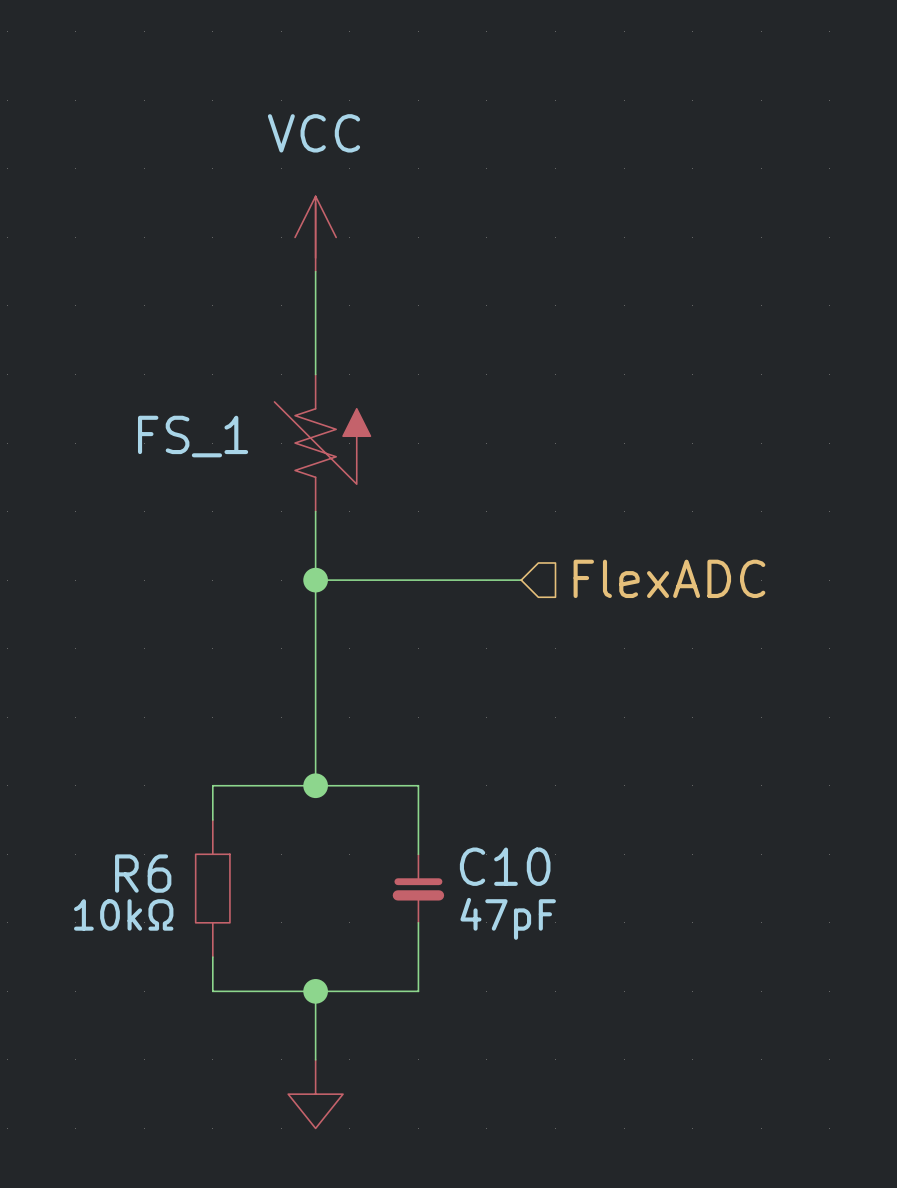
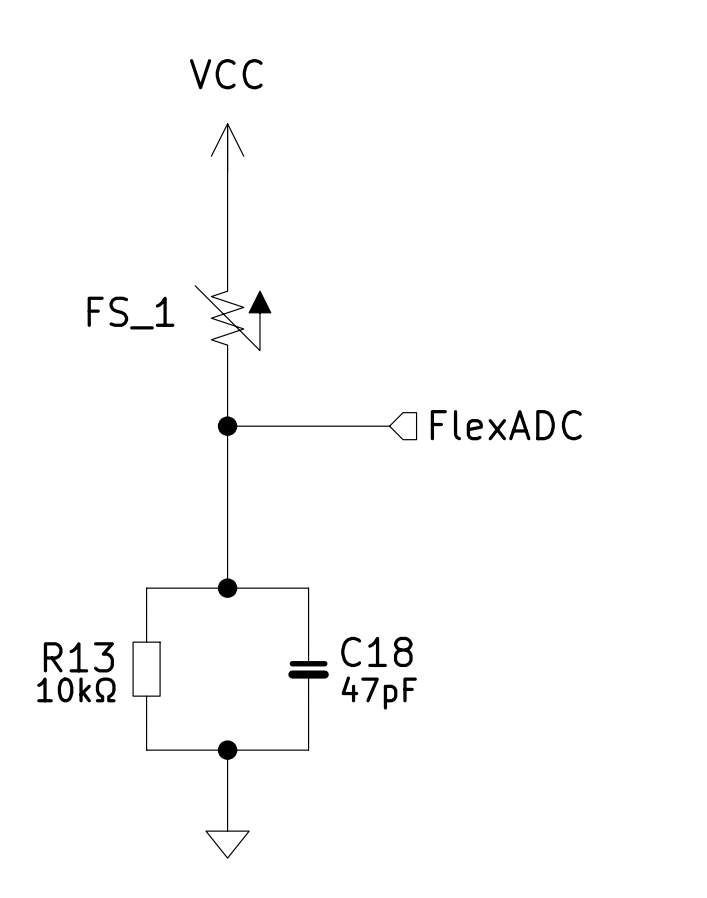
C10 name: C10 (505, 866) -> C18 (376, 651)
R6 name: R6 (143, 873) -> R13 (78, 657)

